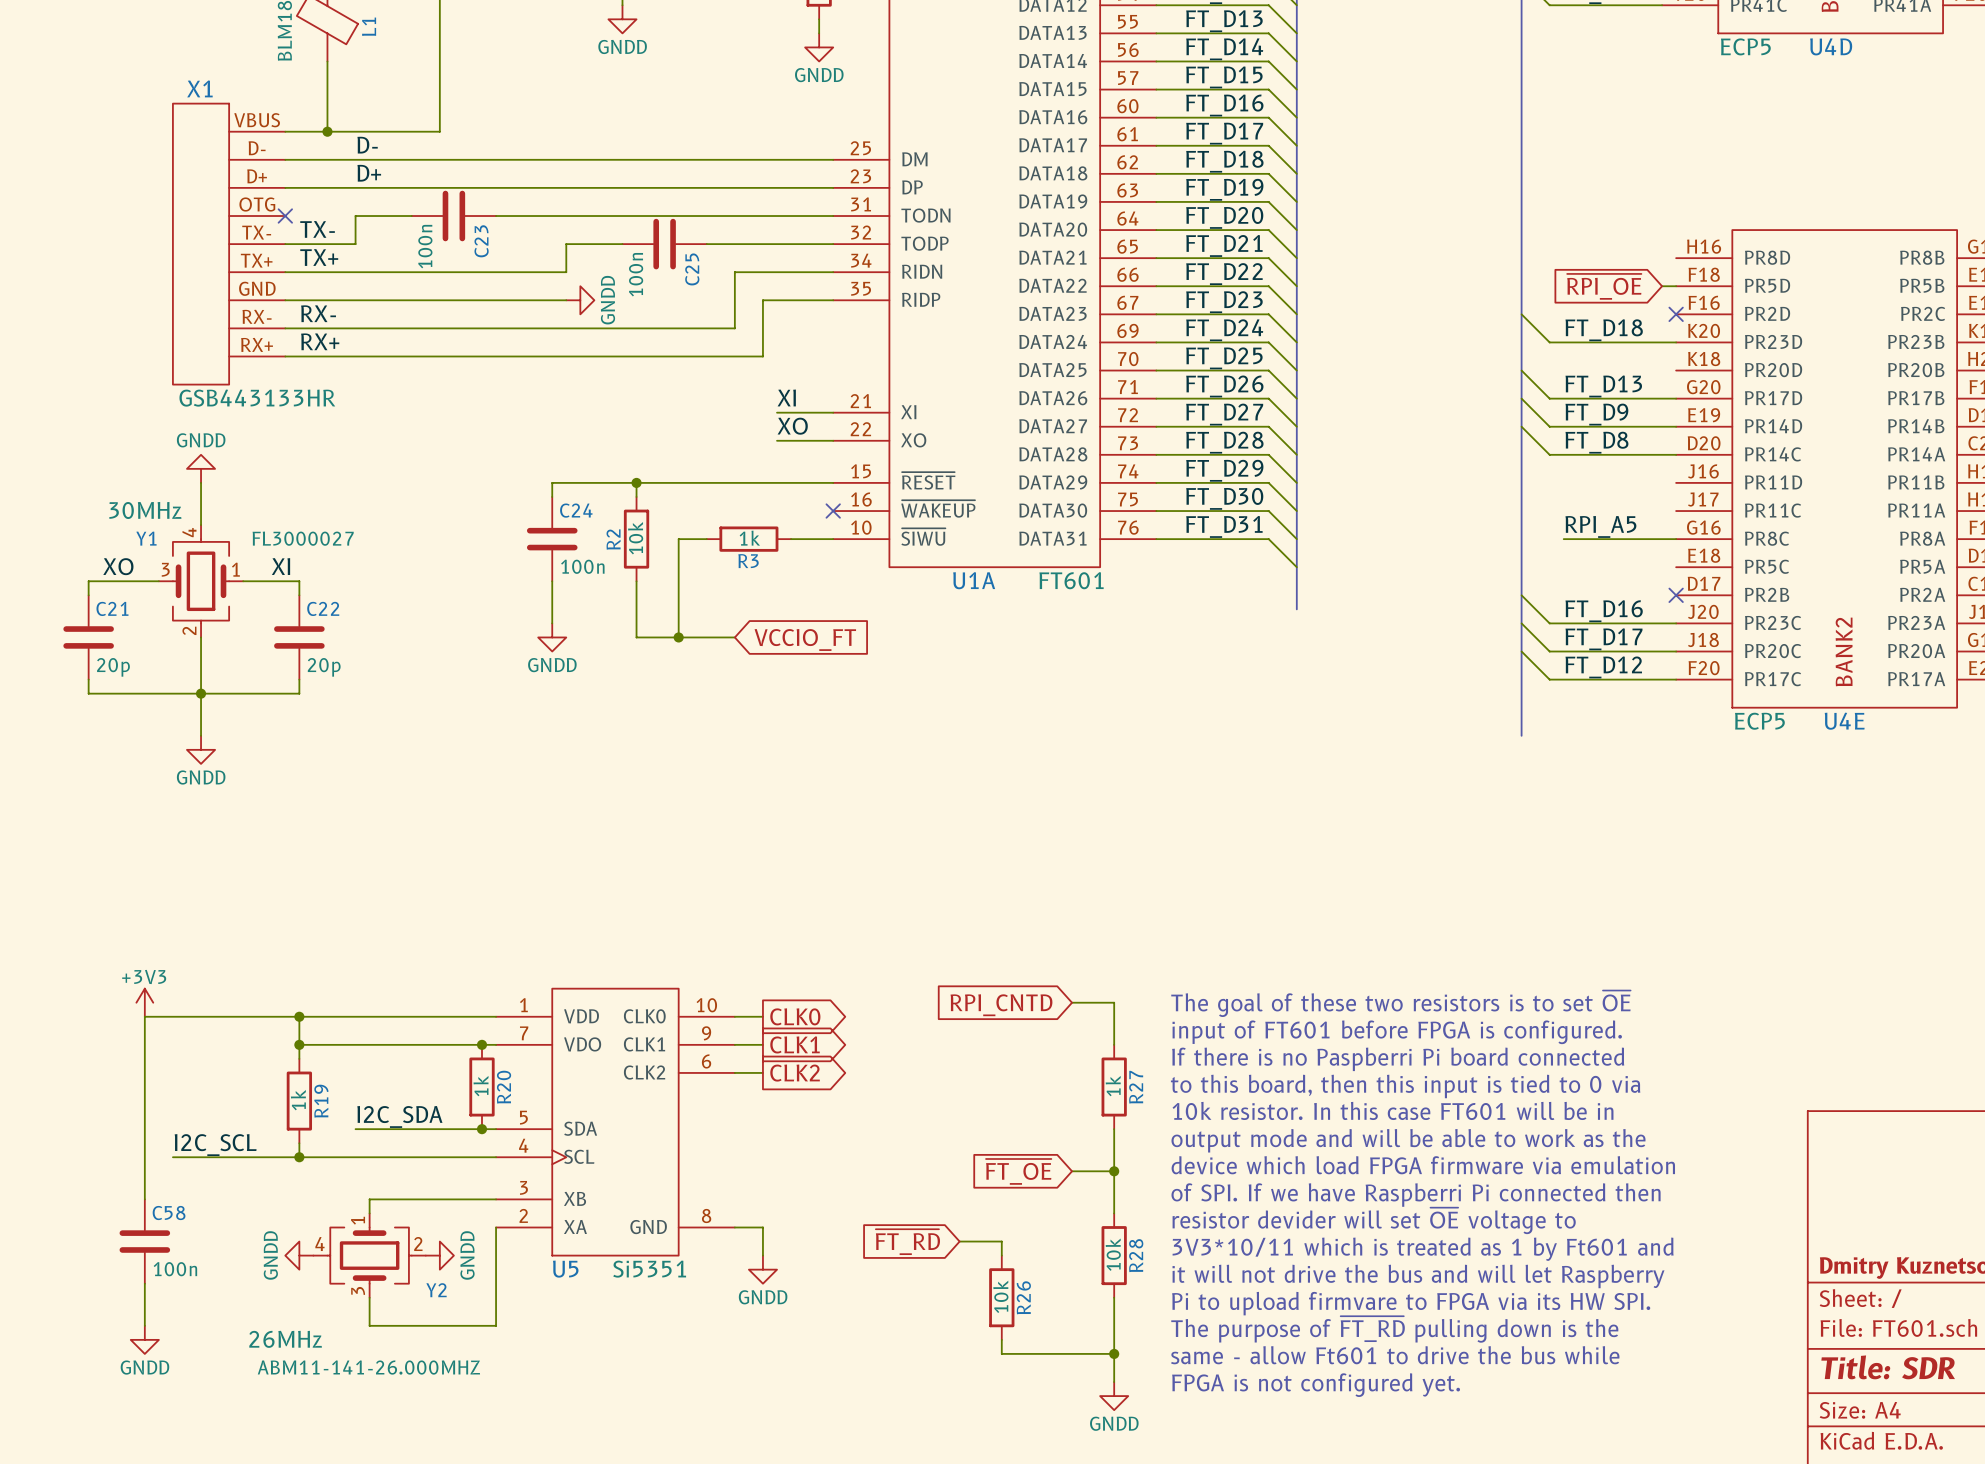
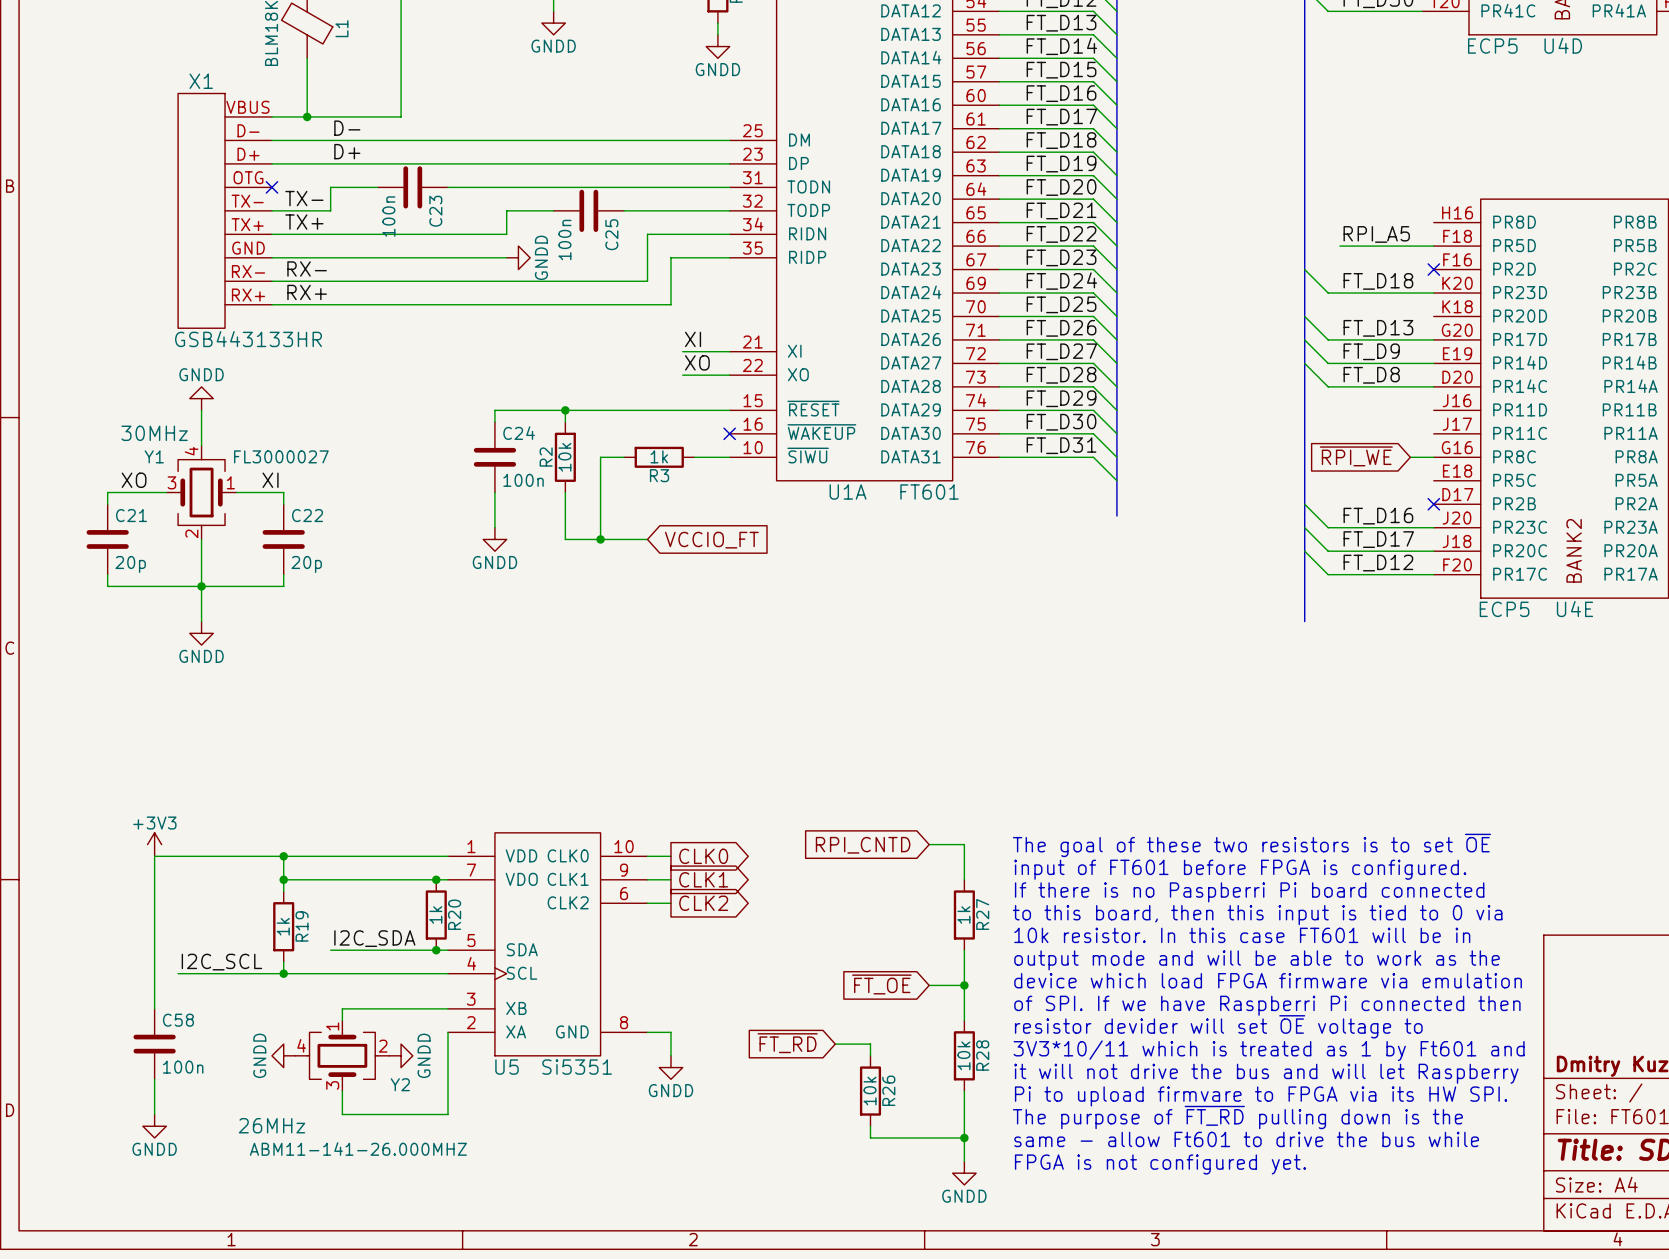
wire: none -> (1339, 246) (1422, 246)
global label: ~{RPI_OE} (1604, 286) -> none
label position: RPI_A5 (1600, 526) -> RPI_A5 (1376, 234)
wire: (1563, 539) (1648, 539) -> none
global label: none -> ~{RPI_WE} (1356, 456)

